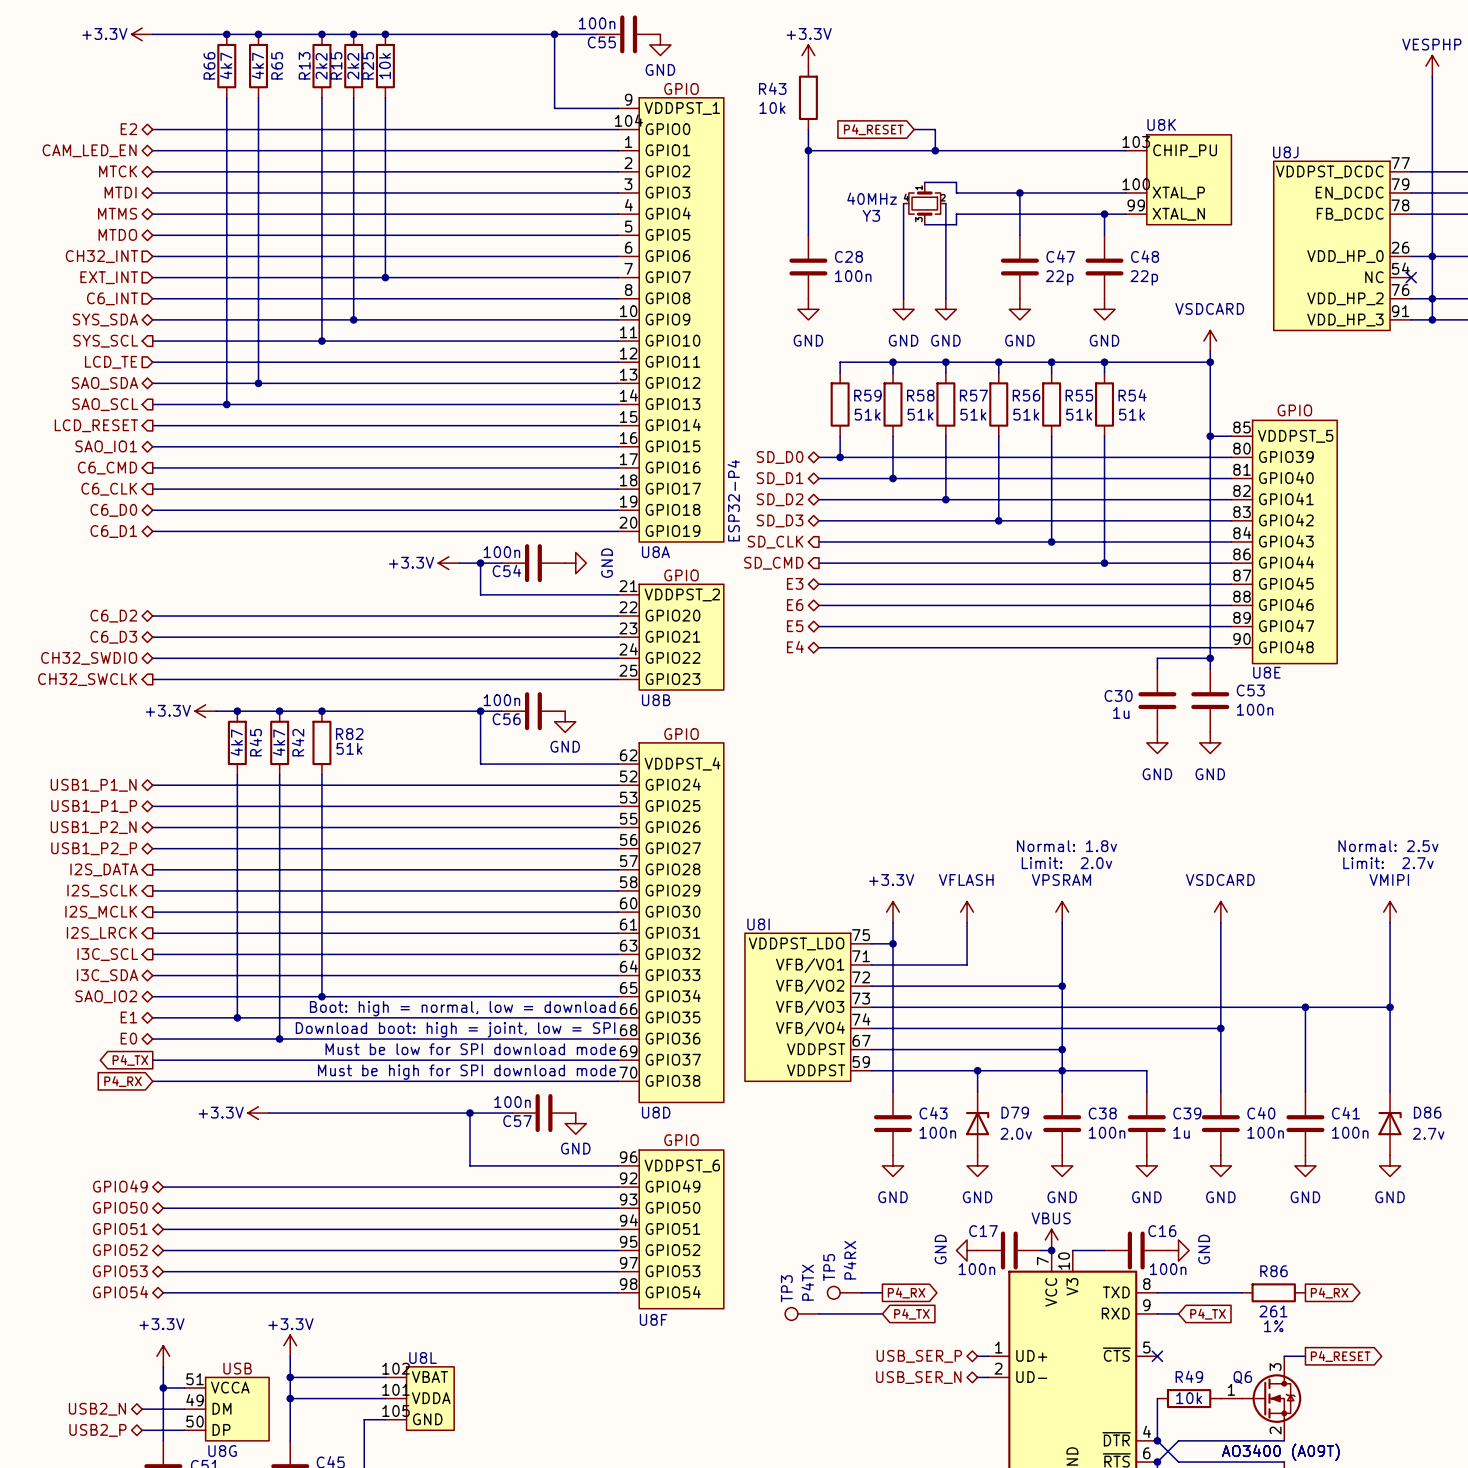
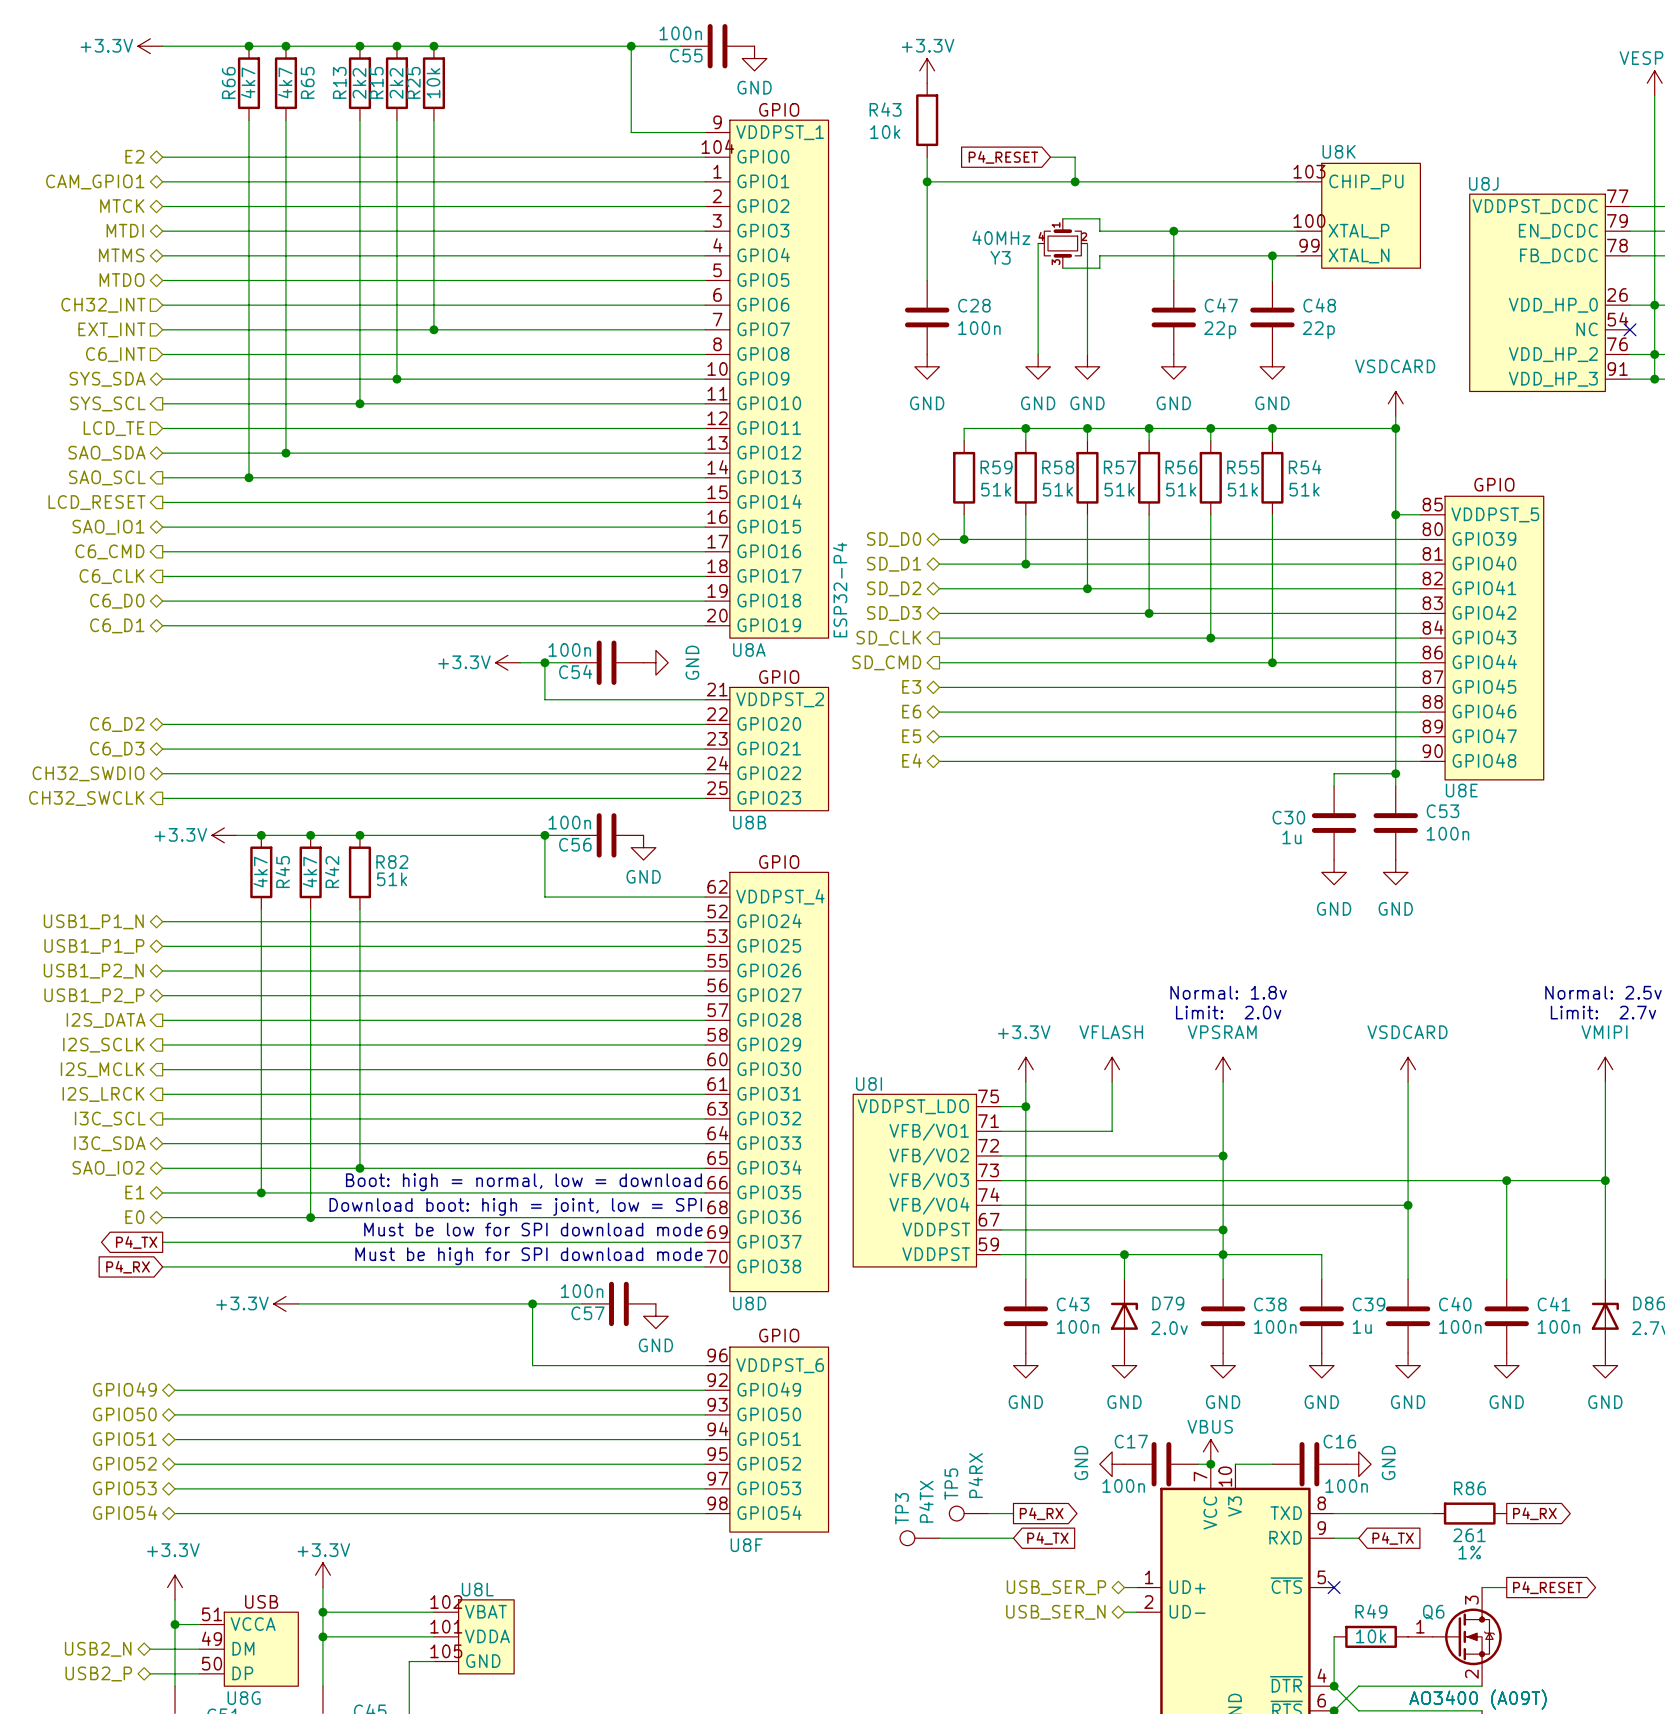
hierarchical label: CAM_LED_EN (89, 150) -> CAM_GPIO1 (95, 181)

